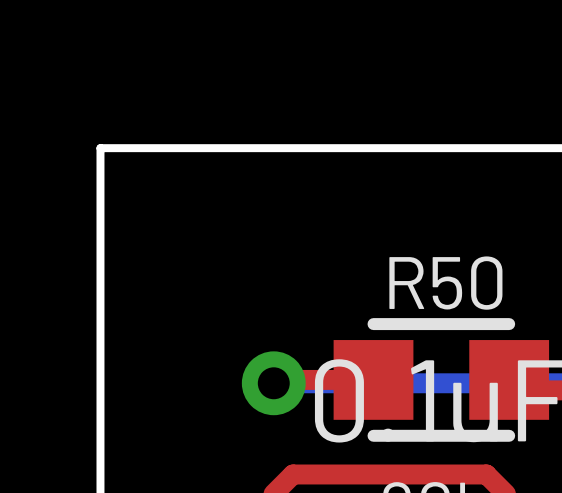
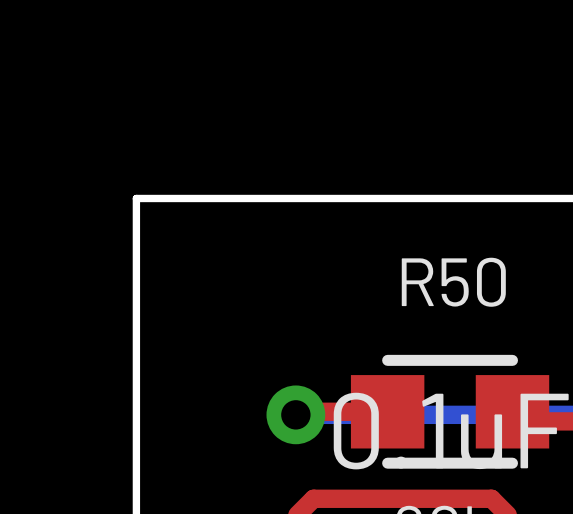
R50 name position: R50 (445, 283) -> R50 (453, 282)

